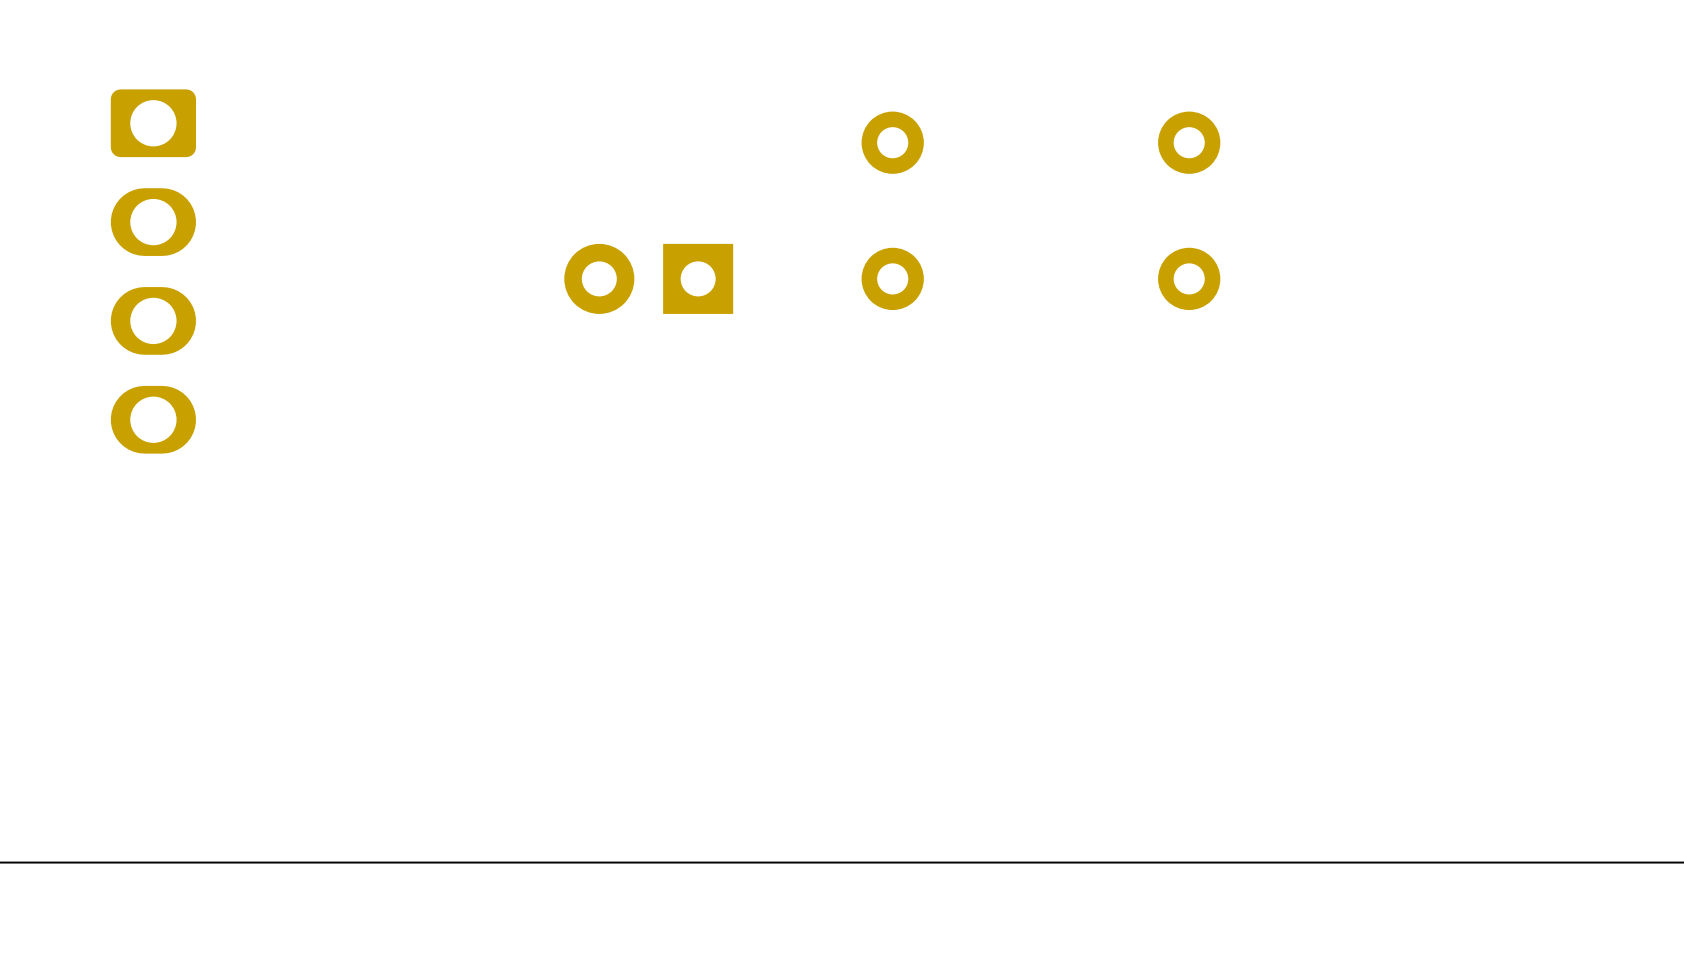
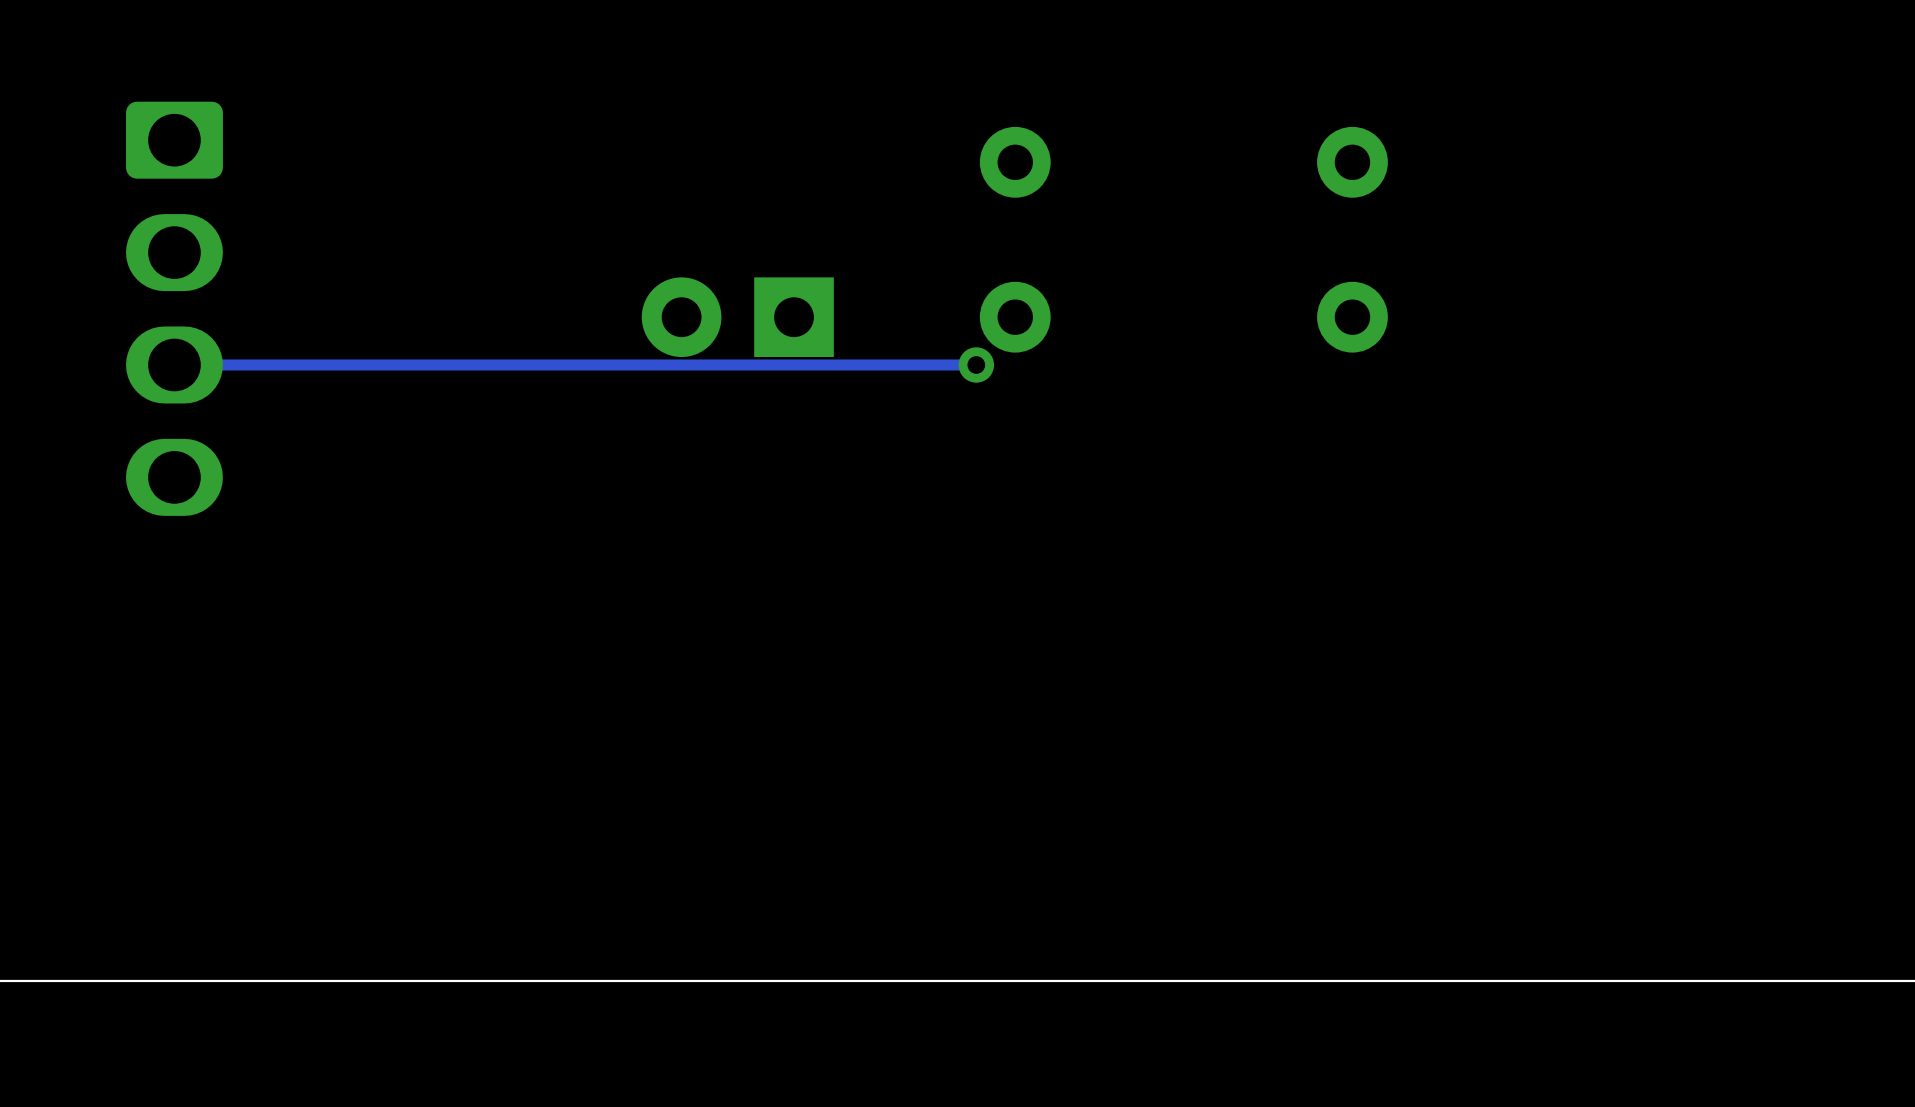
track: none -> (976, 364) (174, 364)
via: none -> (976, 364)

